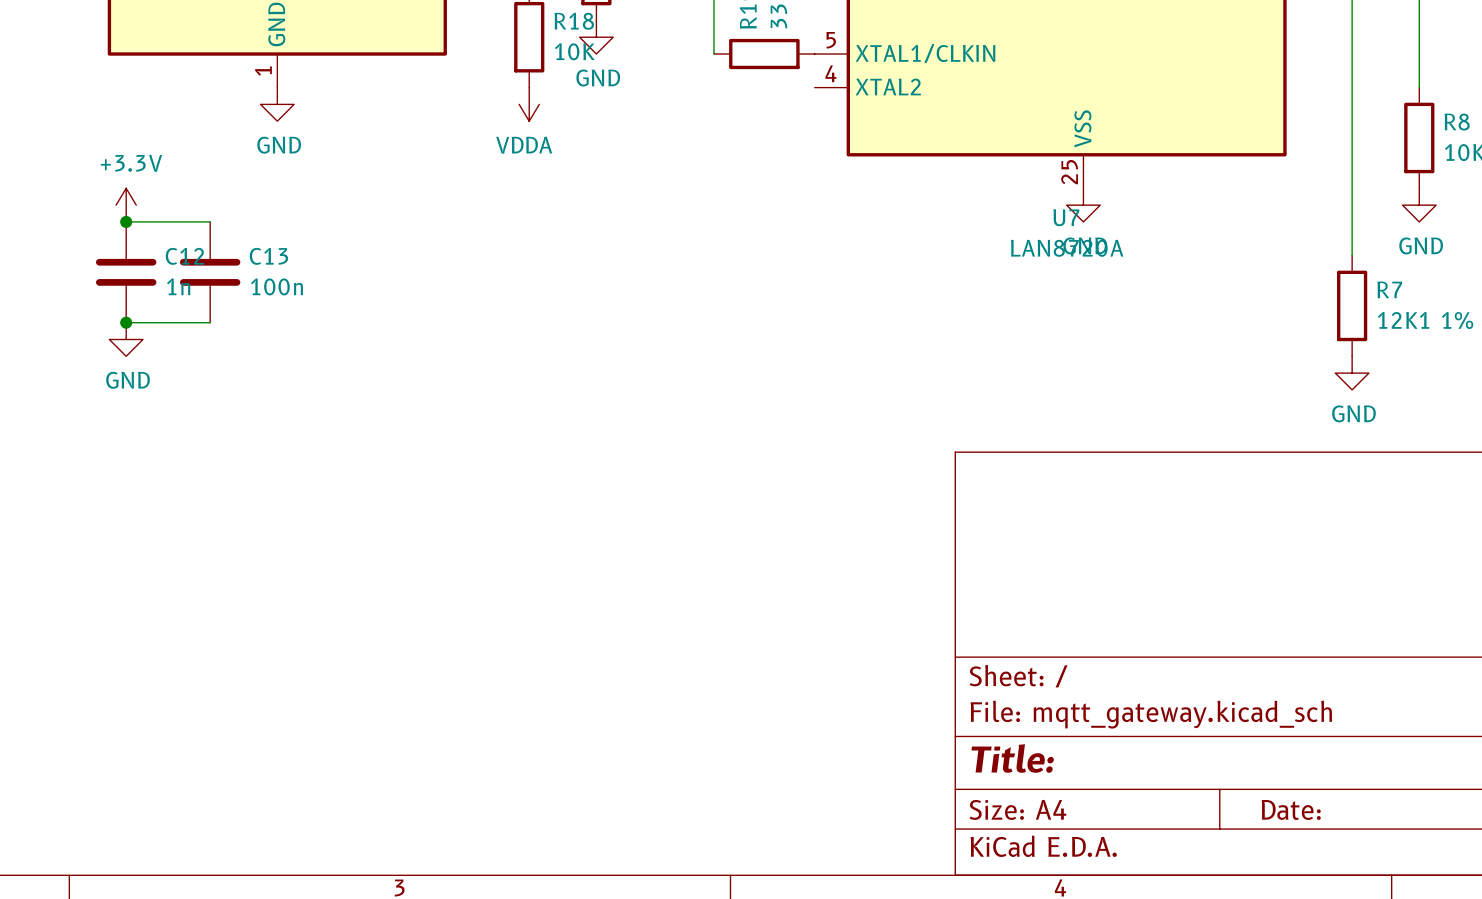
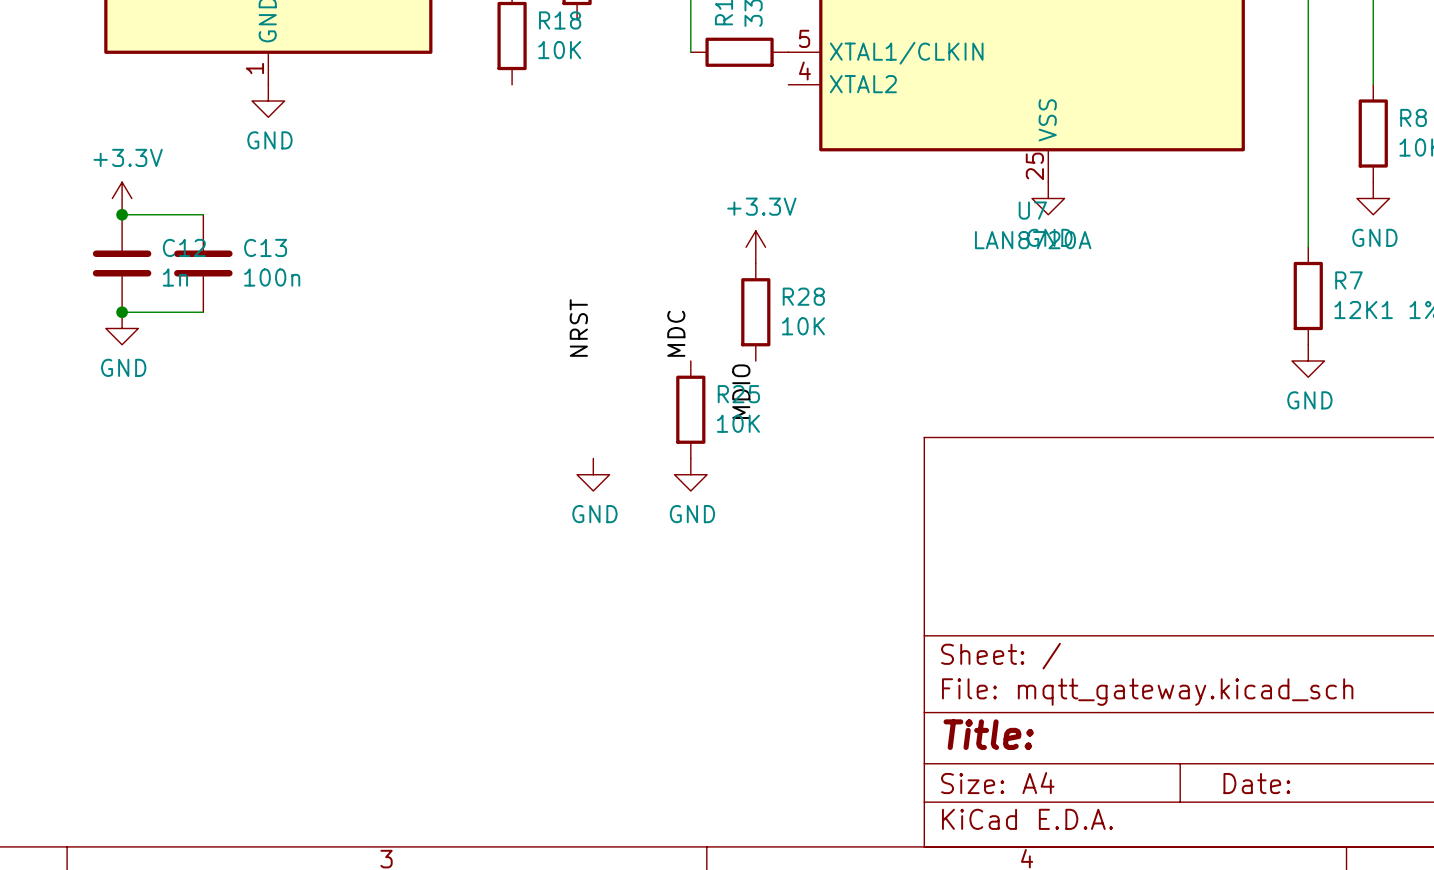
power symbol: GND (596, 37) -> none
power symbol: VDDA (529, 104) -> none
power symbol: none -> +3.3V (755, 247)
R28: none -> 10K (755, 312)
label: none -> NRST (578, 327)
label: none -> MDC (676, 333)
label: none -> MDIO (741, 391)
R25: none -> 10K (690, 409)
power symbol: none -> GND (593, 474)
power symbol: none -> GND (690, 474)

